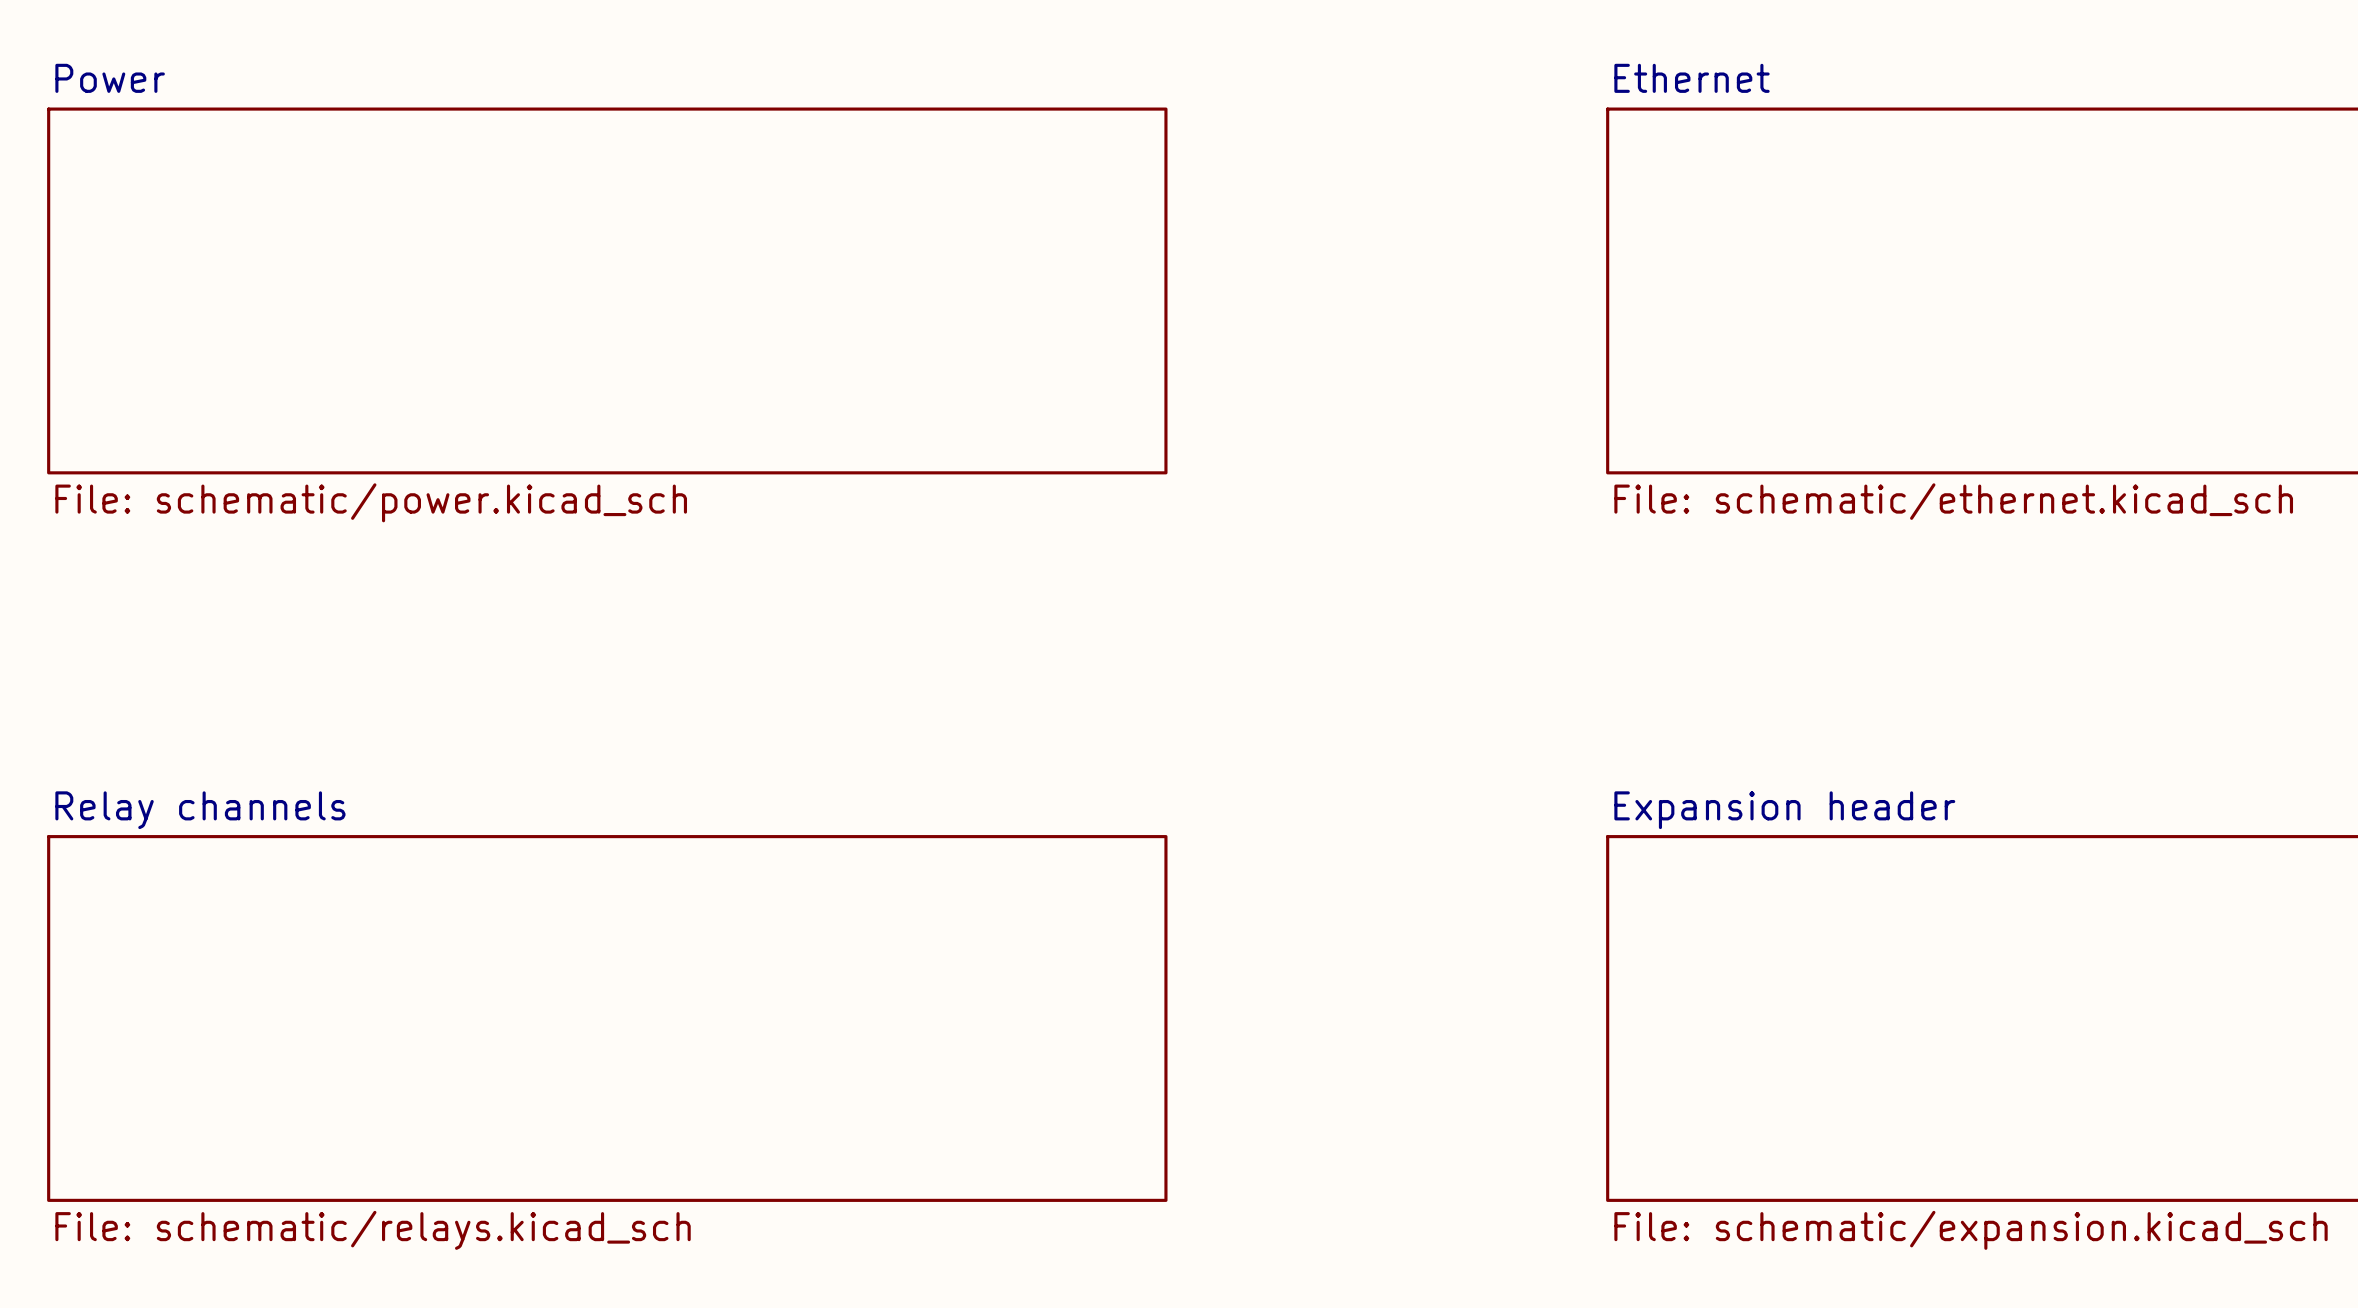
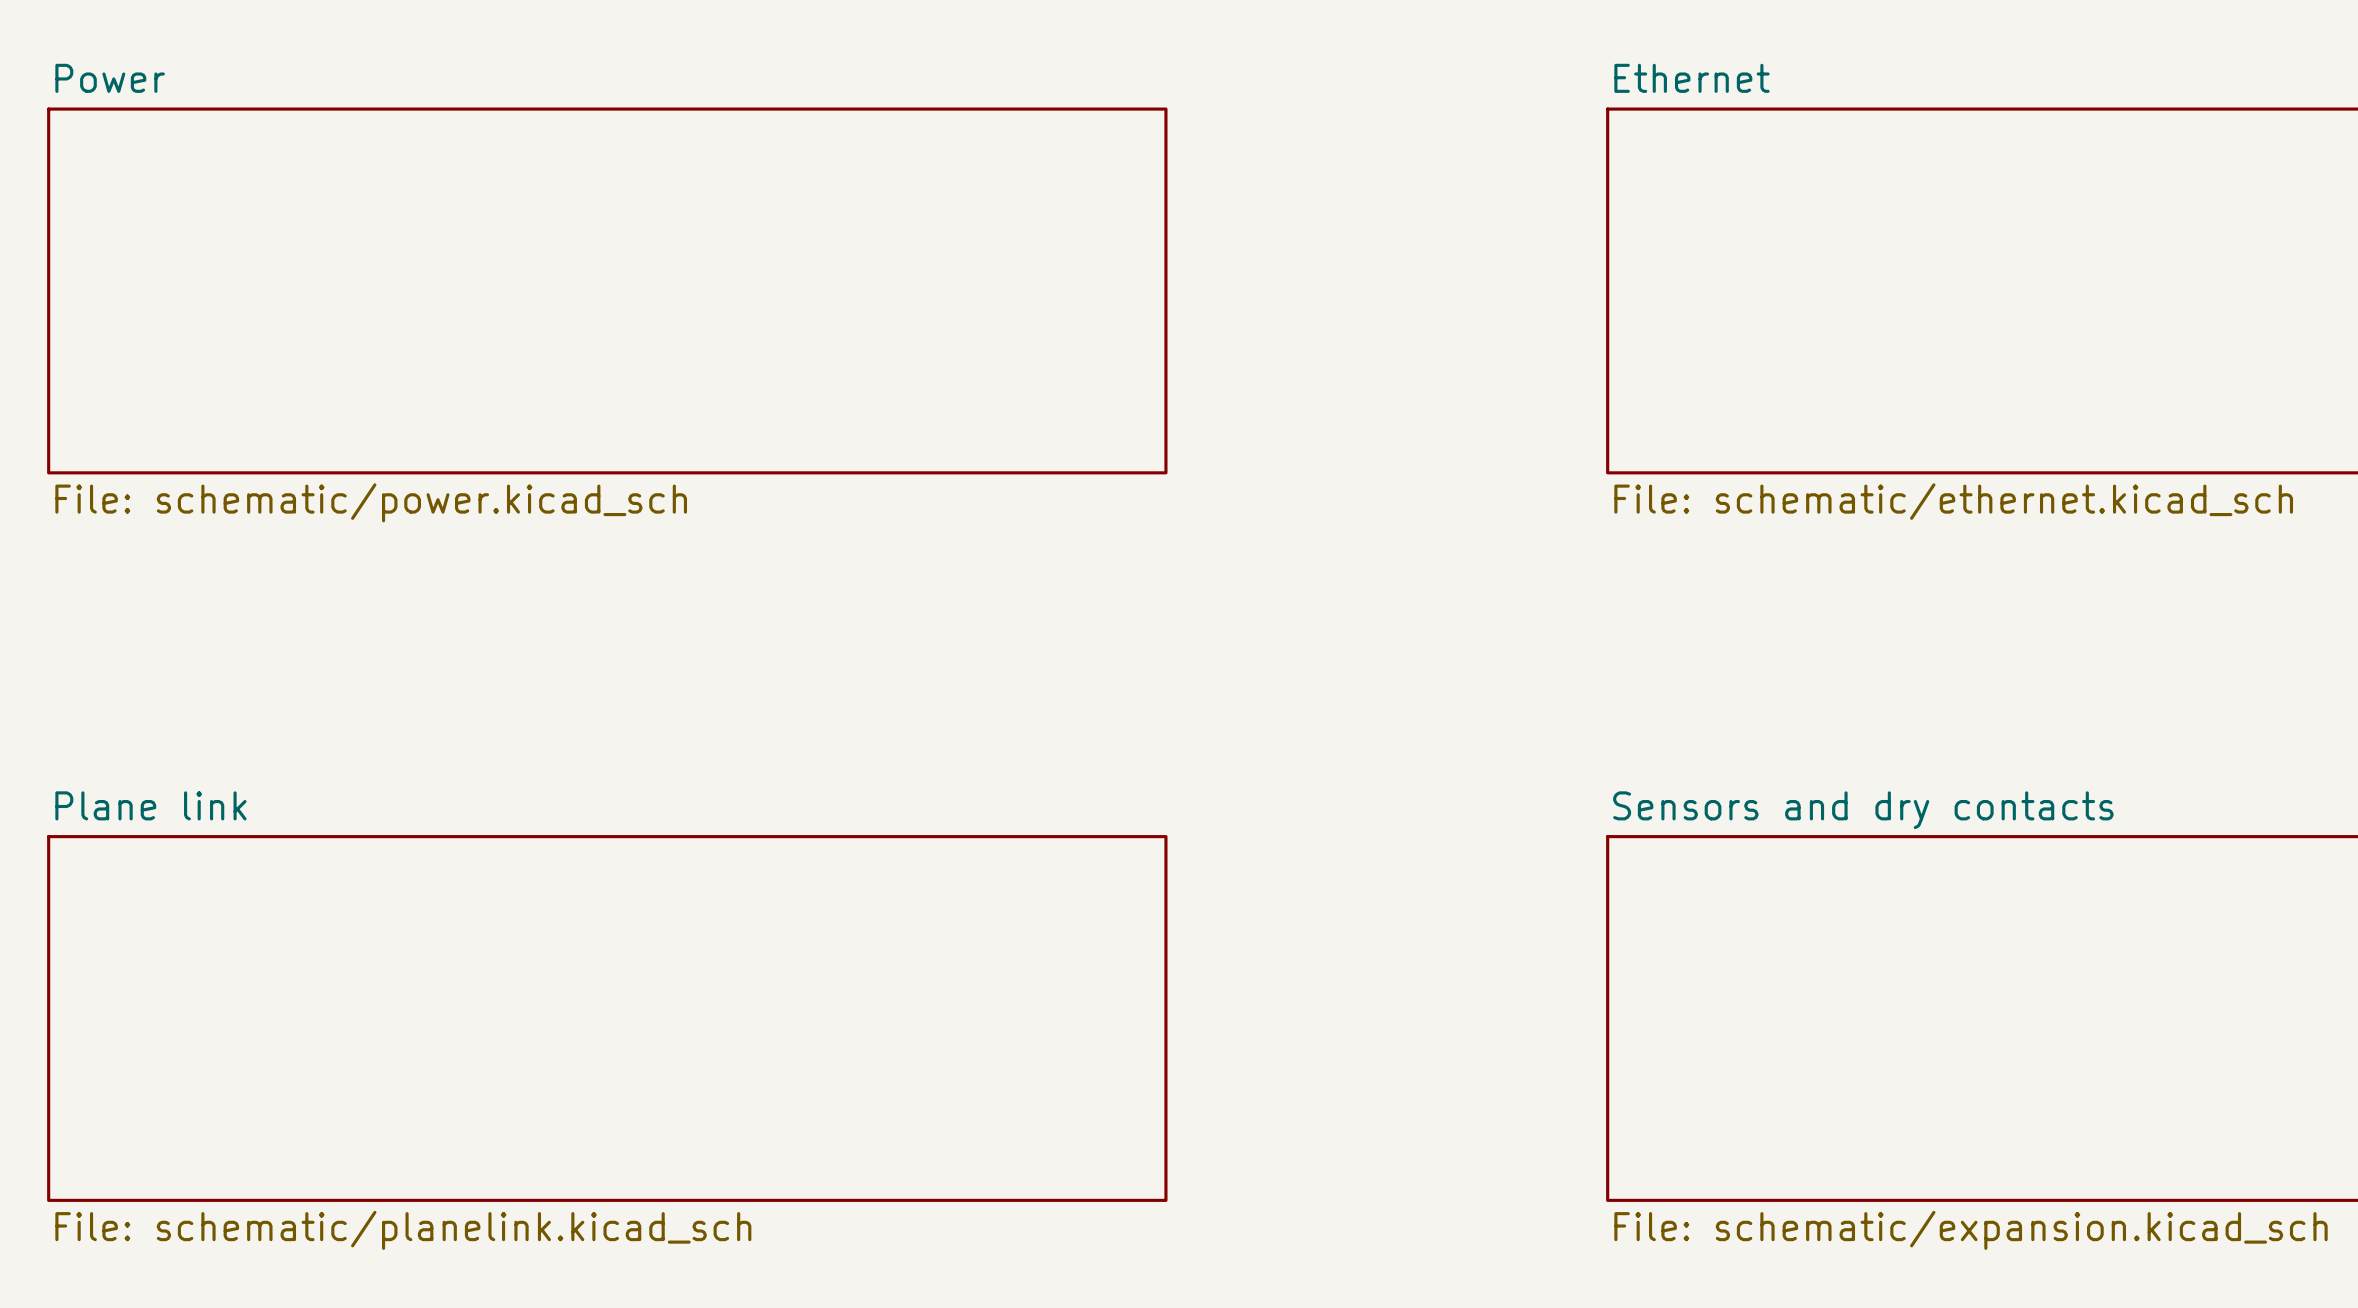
sheet Relay channels name: Relay channels (200, 810) -> Plane link (150, 805)
sheet Expansion header name: Expansion header (1784, 810) -> Sensors and dry contacts (1863, 810)
sheet Relay channels value: File: schematic/relays.kicad_sch (373, 1230) -> File: schematic/planelink.kicad_sch (403, 1230)

